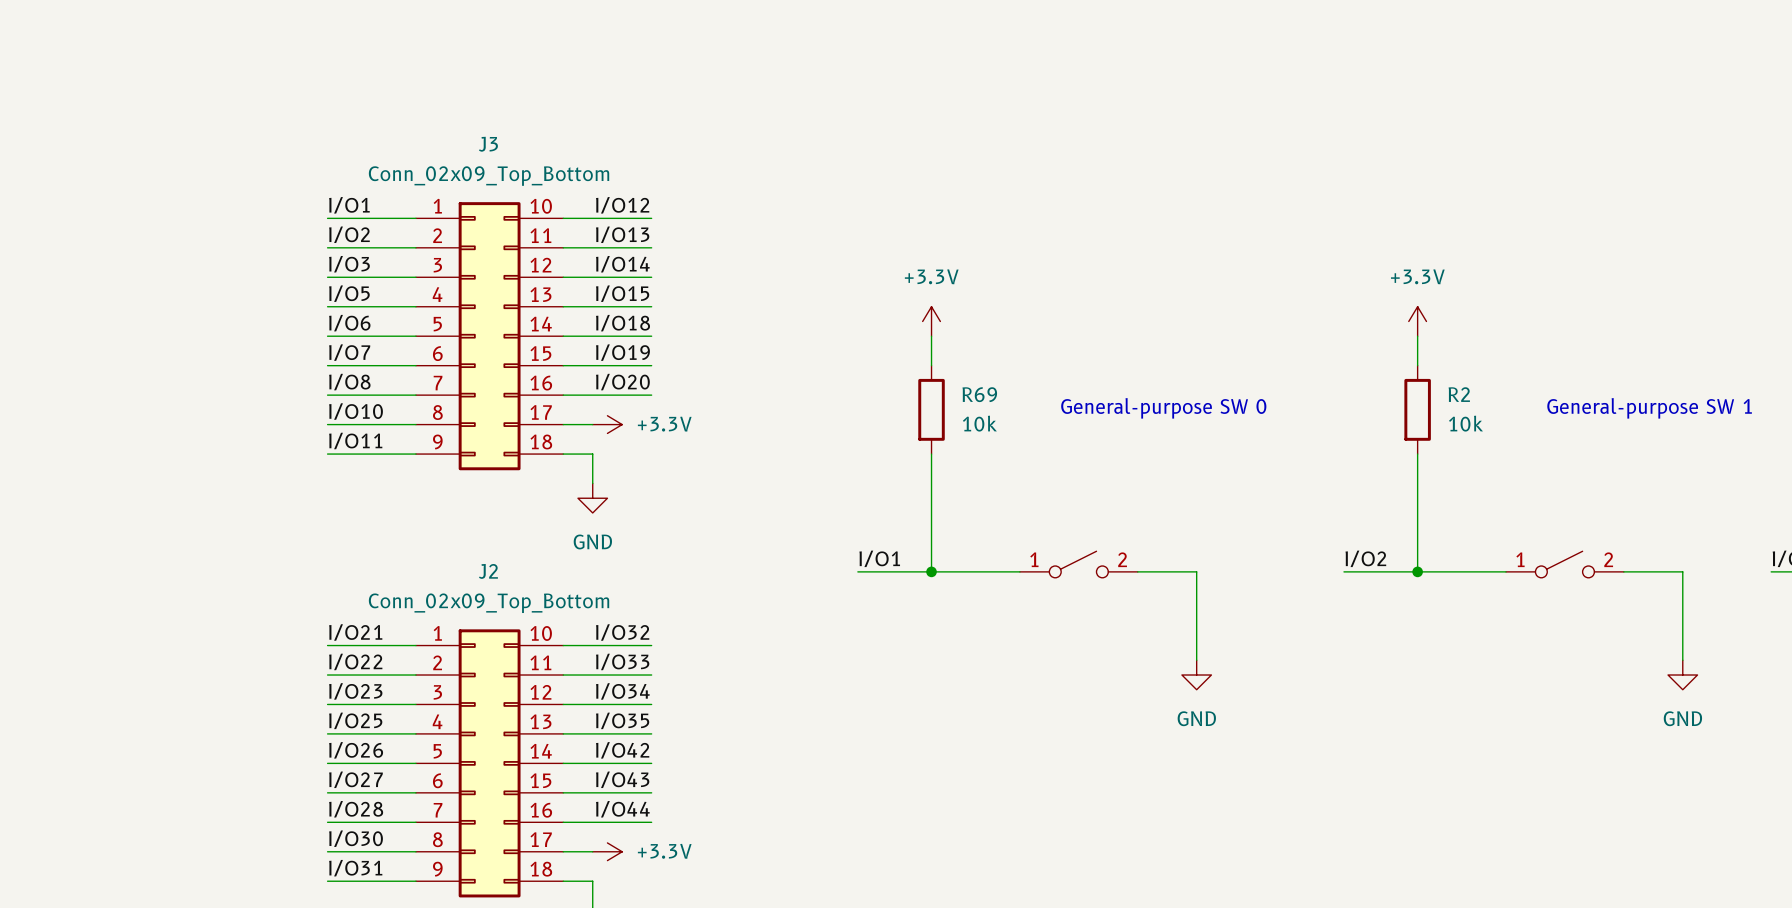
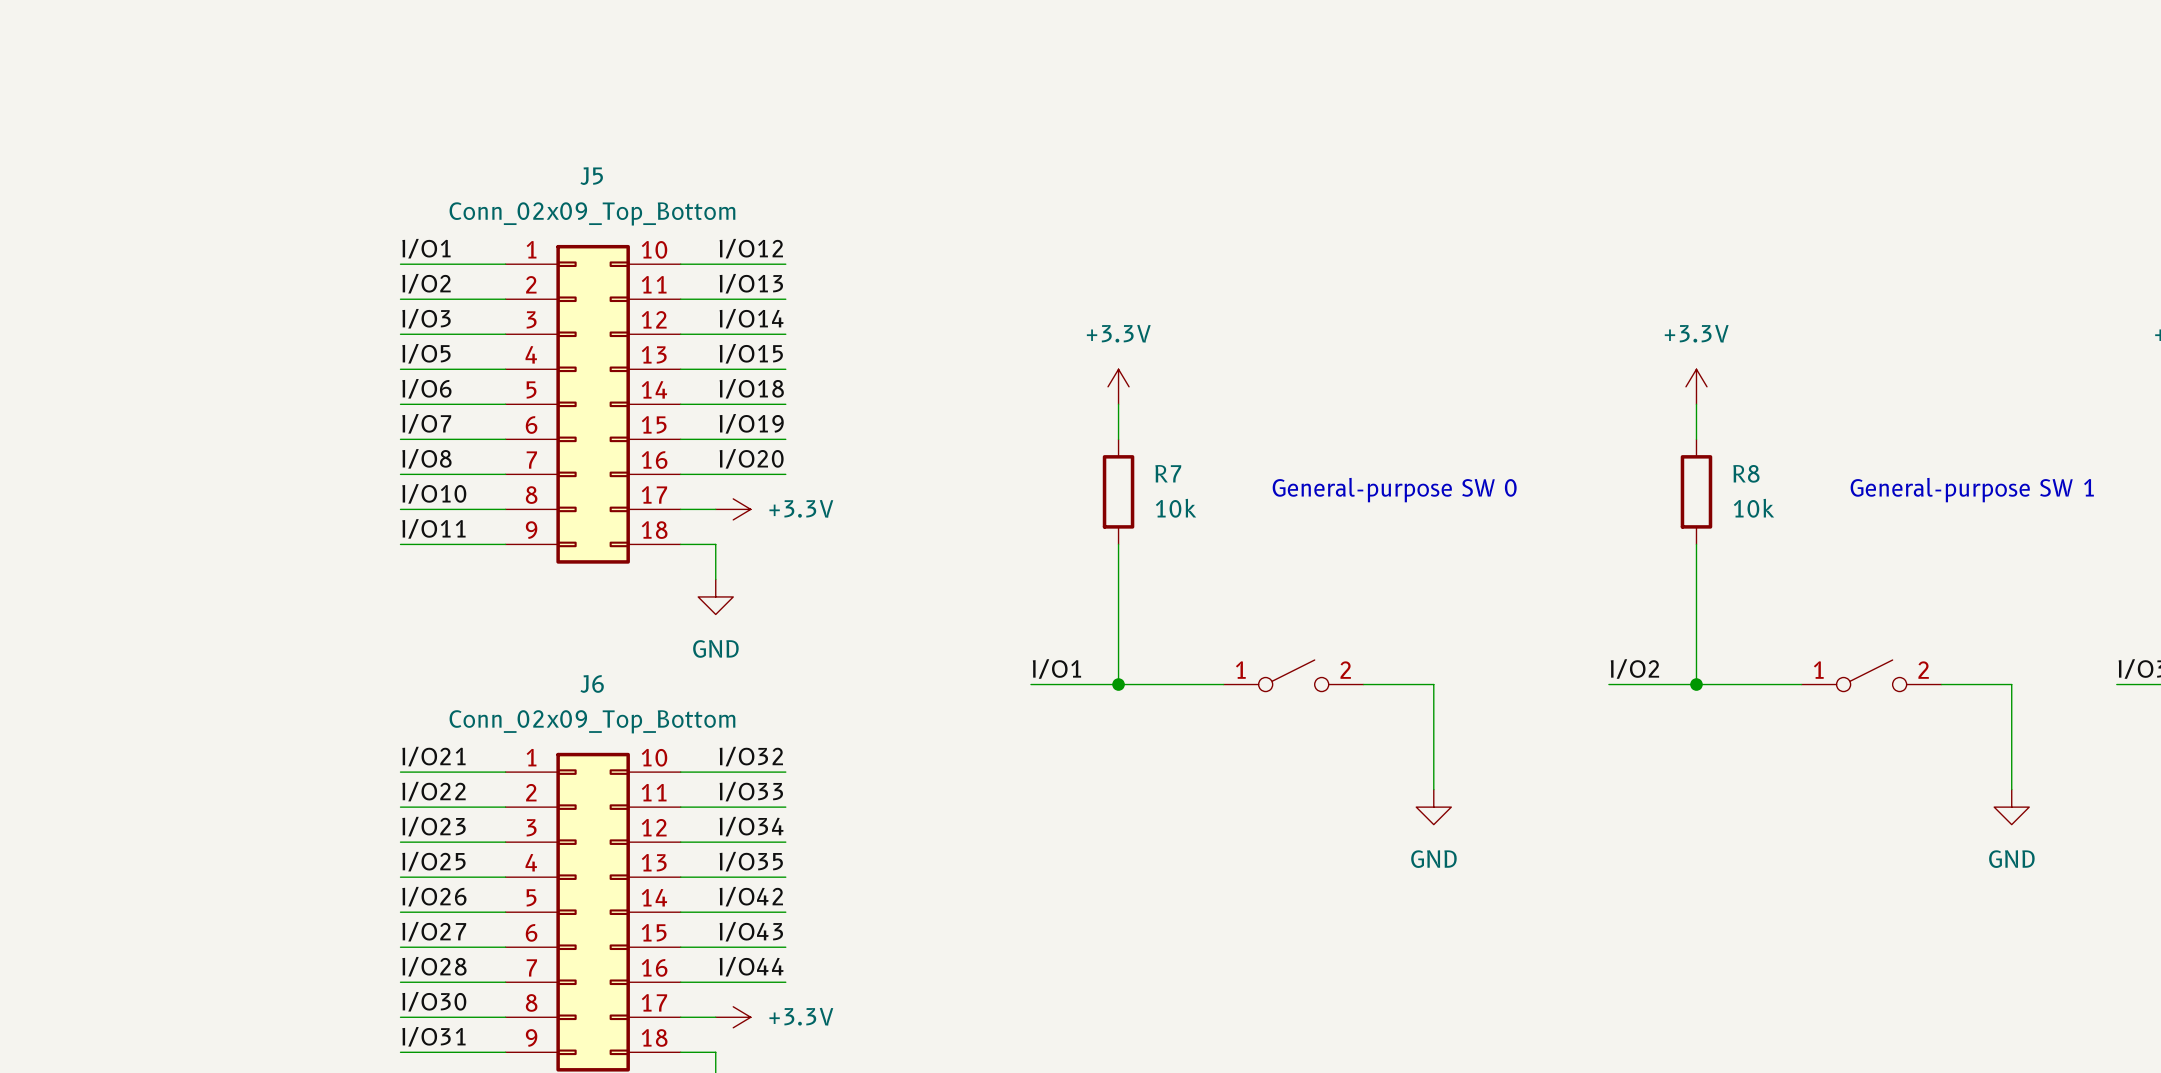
J3 name: J3 (488, 144) -> J5 (591, 176)
R69 name: R69 (979, 394) -> R7 (1168, 473)
R2 name: R2 (1459, 394) -> R8 (1746, 473)
J2 name: J2 (488, 571) -> J6 (592, 683)

